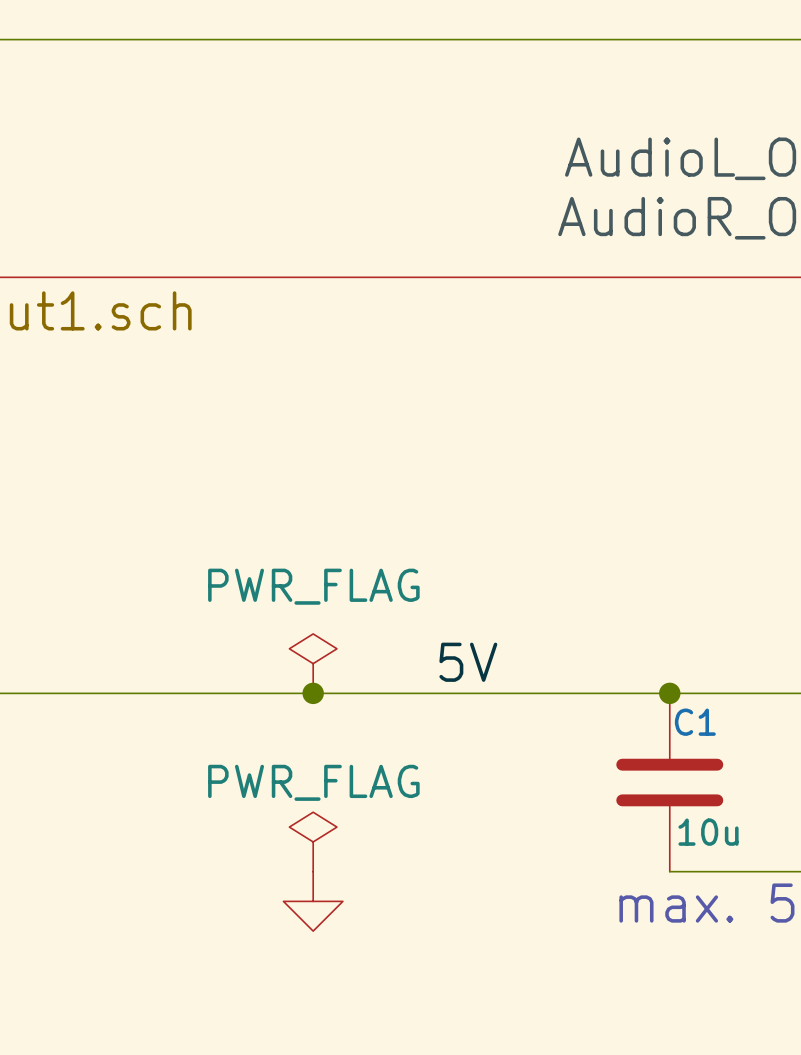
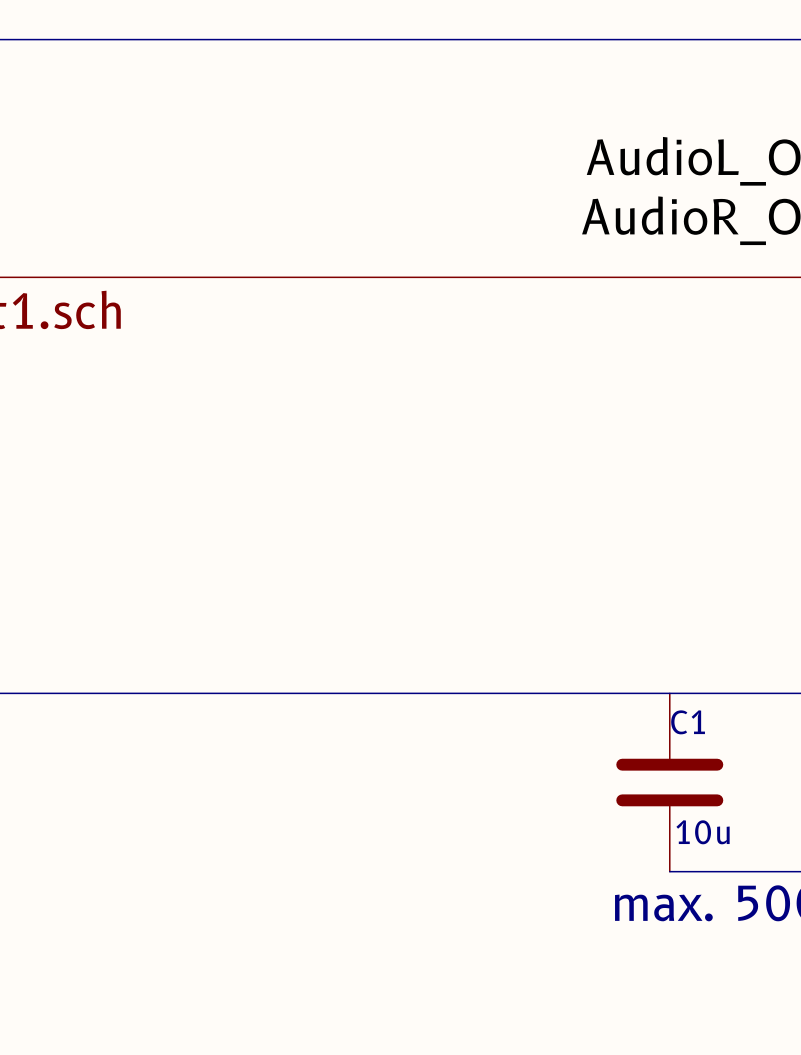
label: 5V (468, 662) -> none
power symbol: PWR_FLAG (313, 663) -> none
junction: (313, 693) -> none
junction: (669, 693) -> none
power symbol: PWR_FLAG (313, 841) -> none
power symbol: (313, 901) -> none

